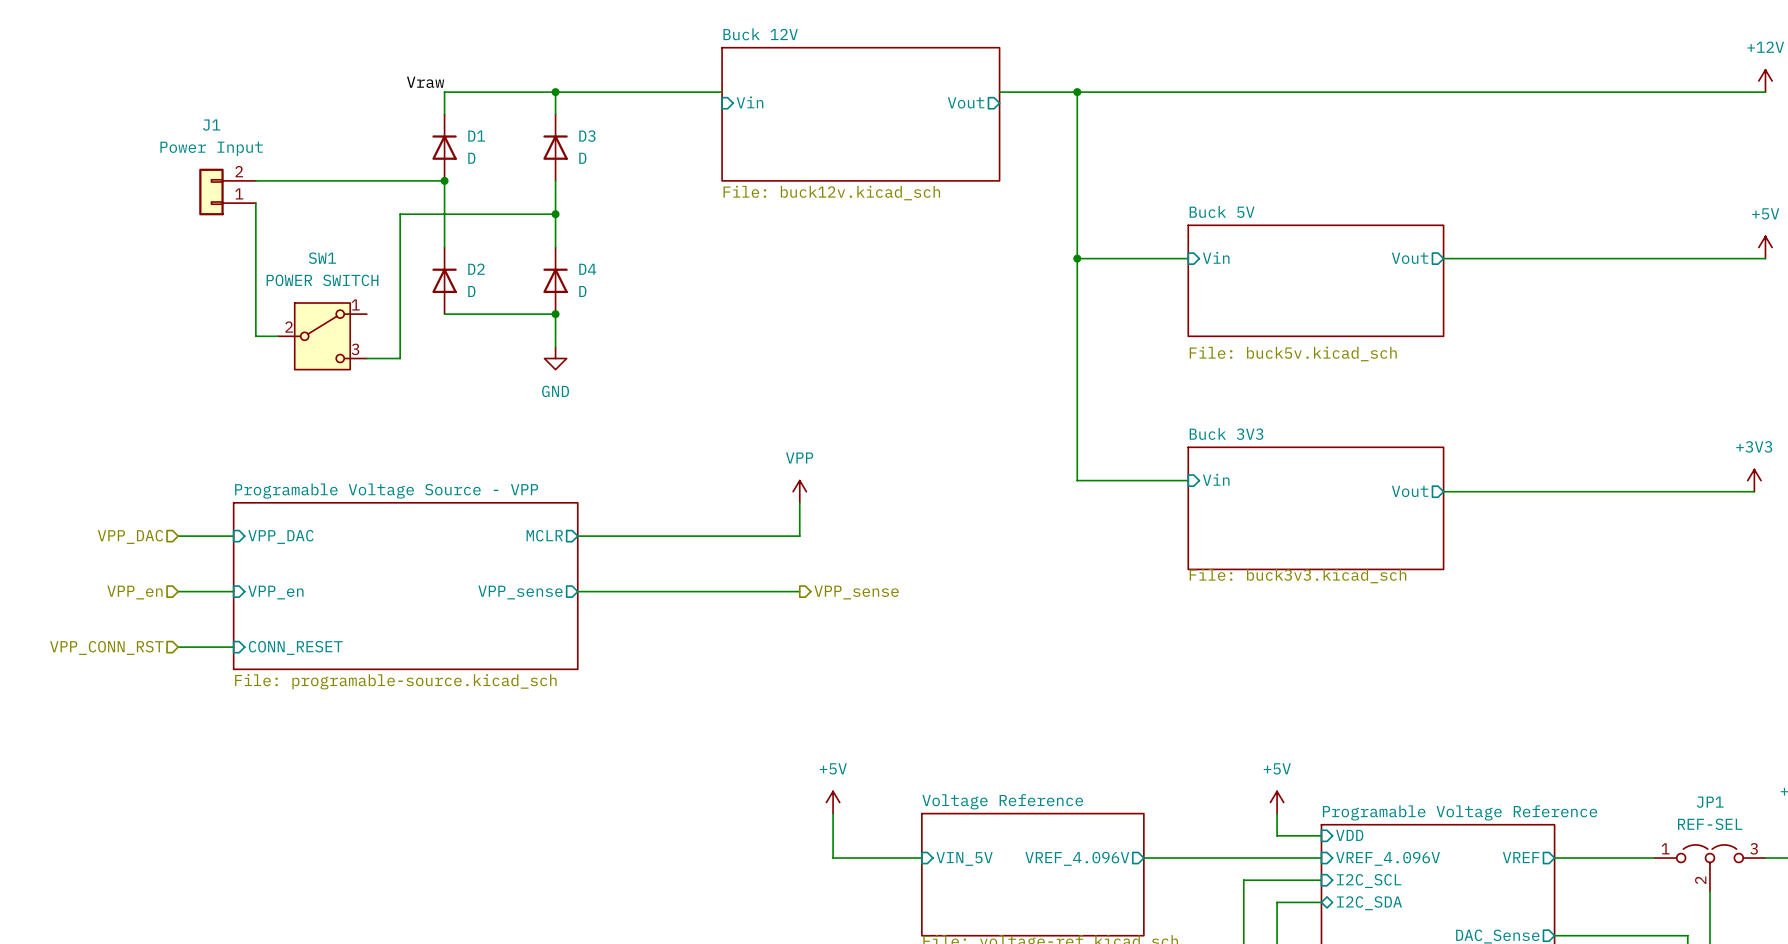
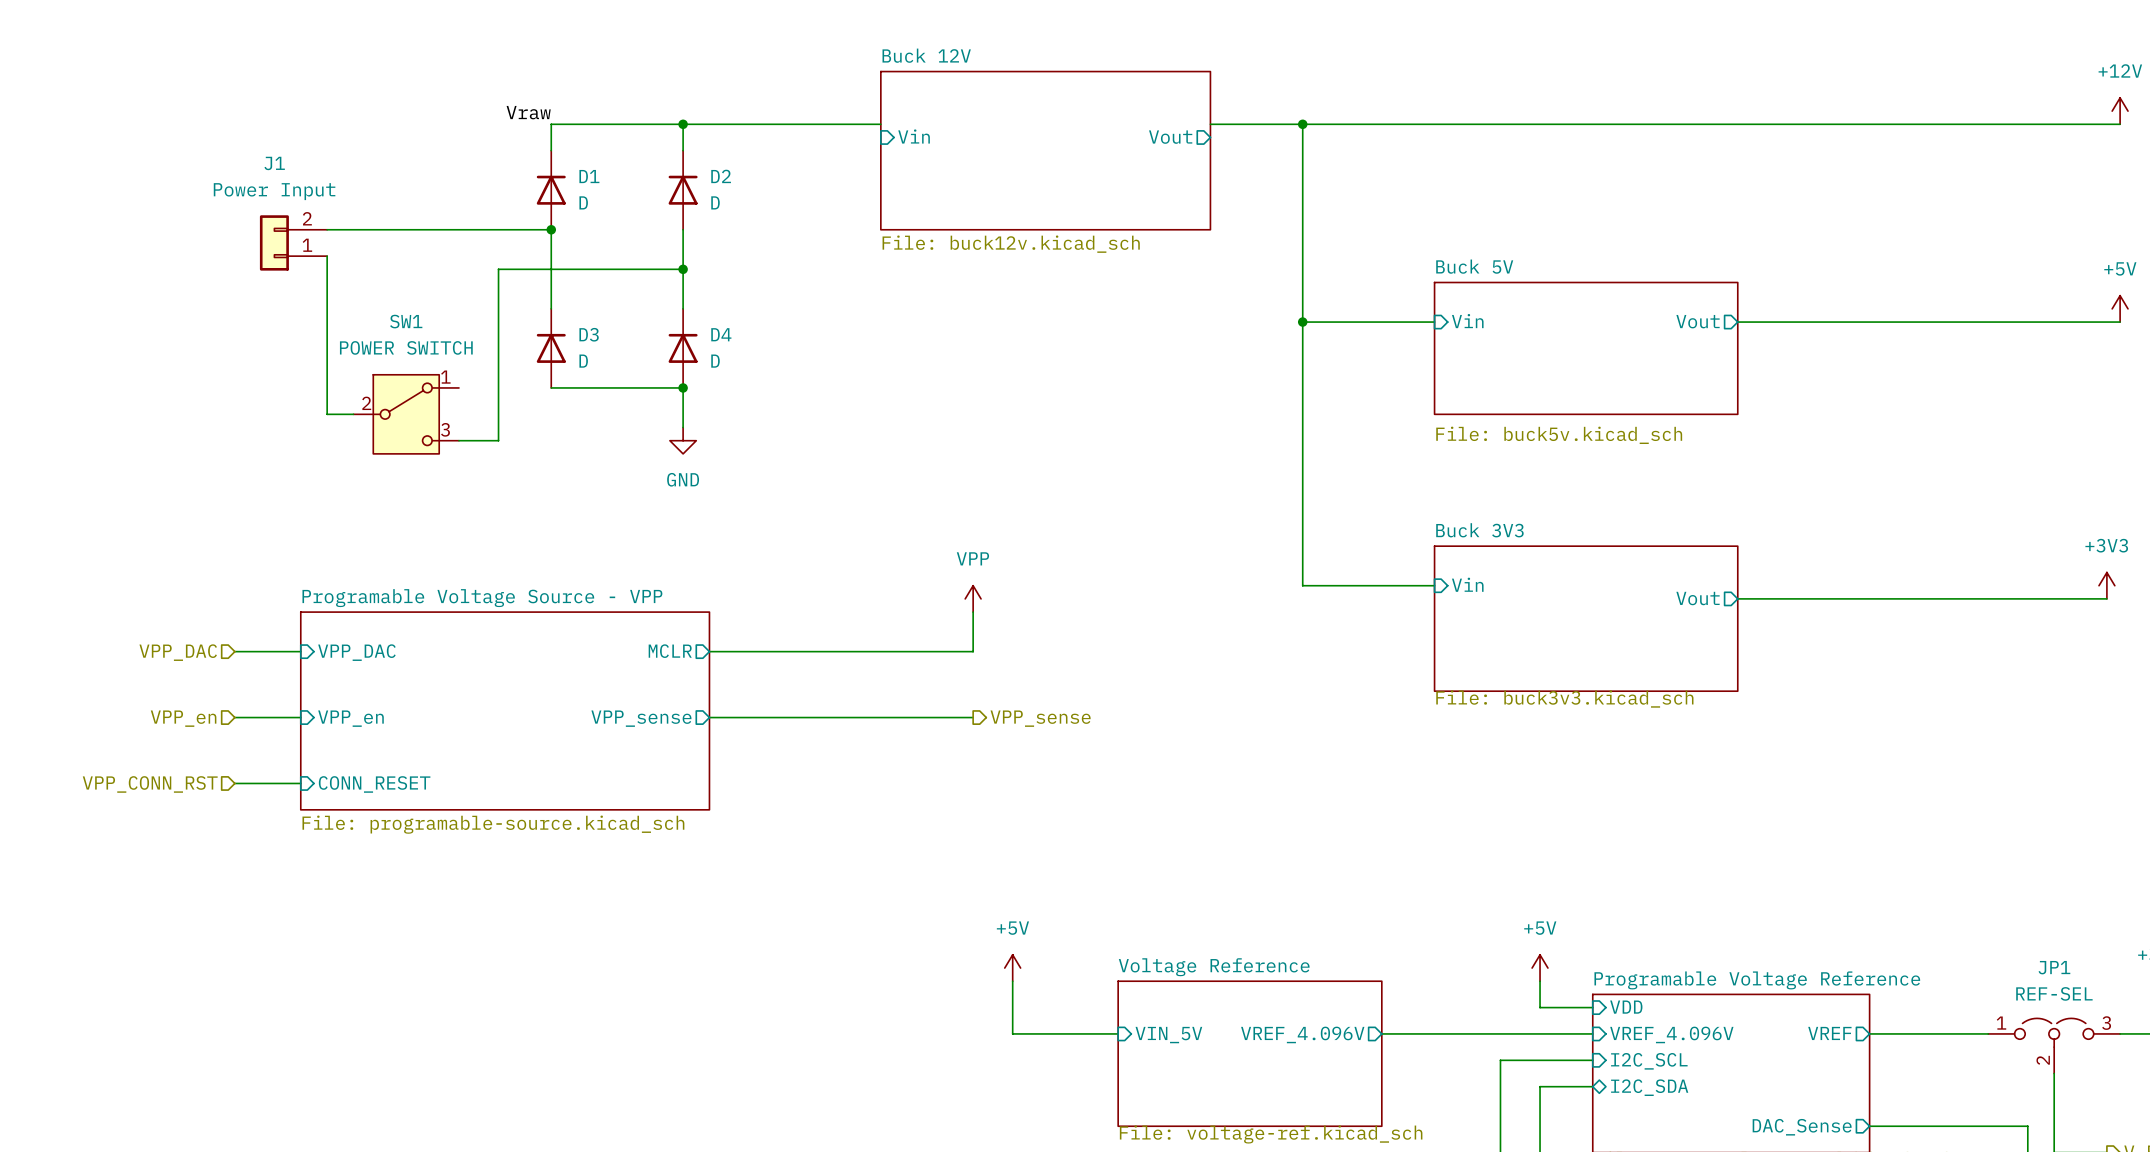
D3 name: D3 (587, 136) -> D2 (721, 176)
D2 name: D2 (476, 269) -> D3 (589, 334)

